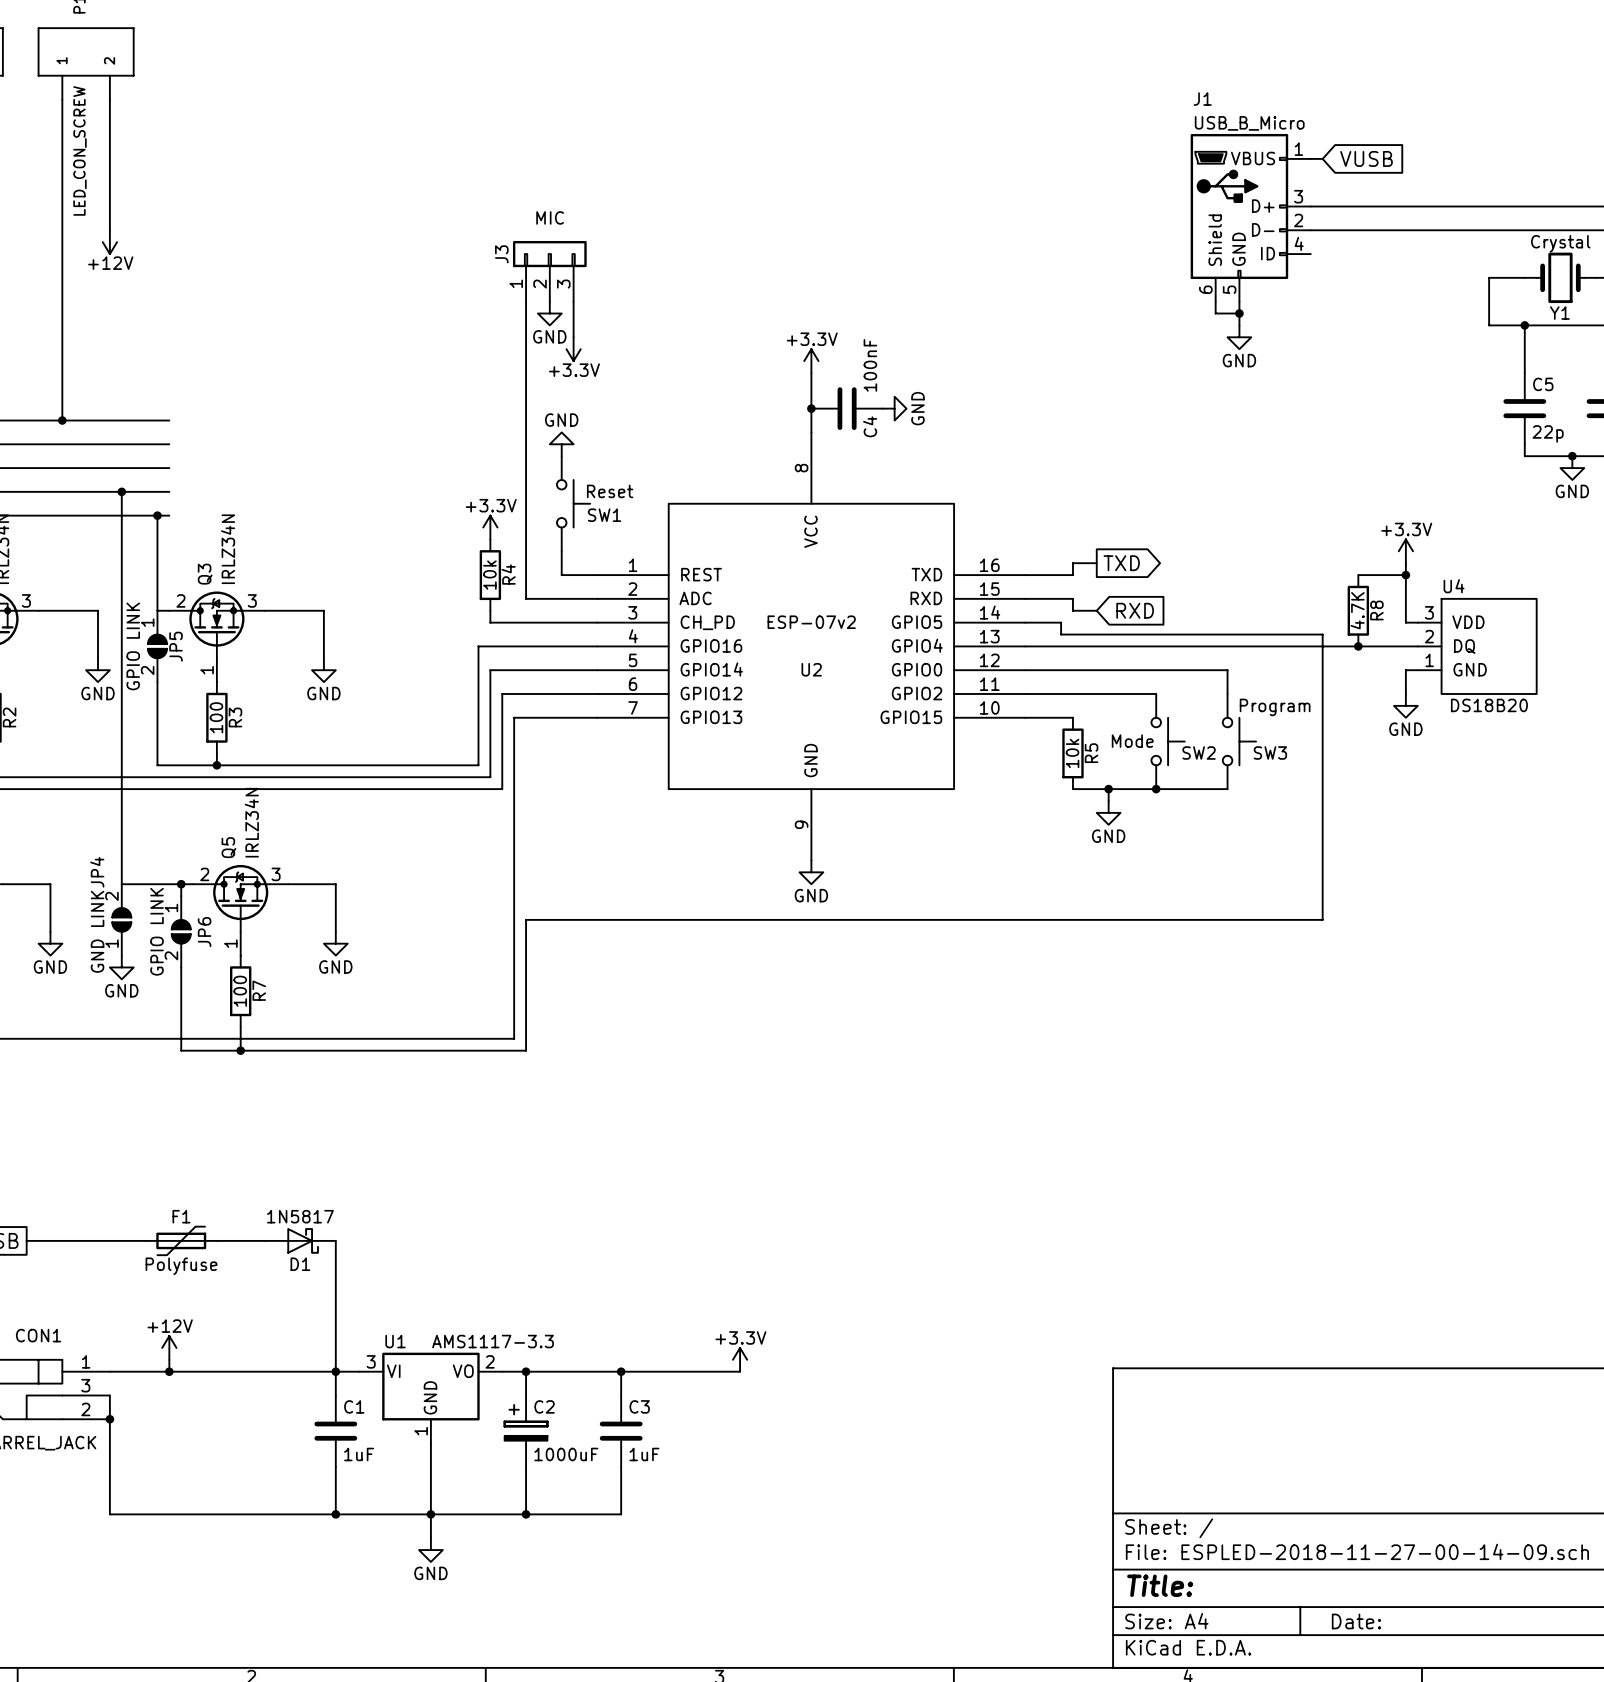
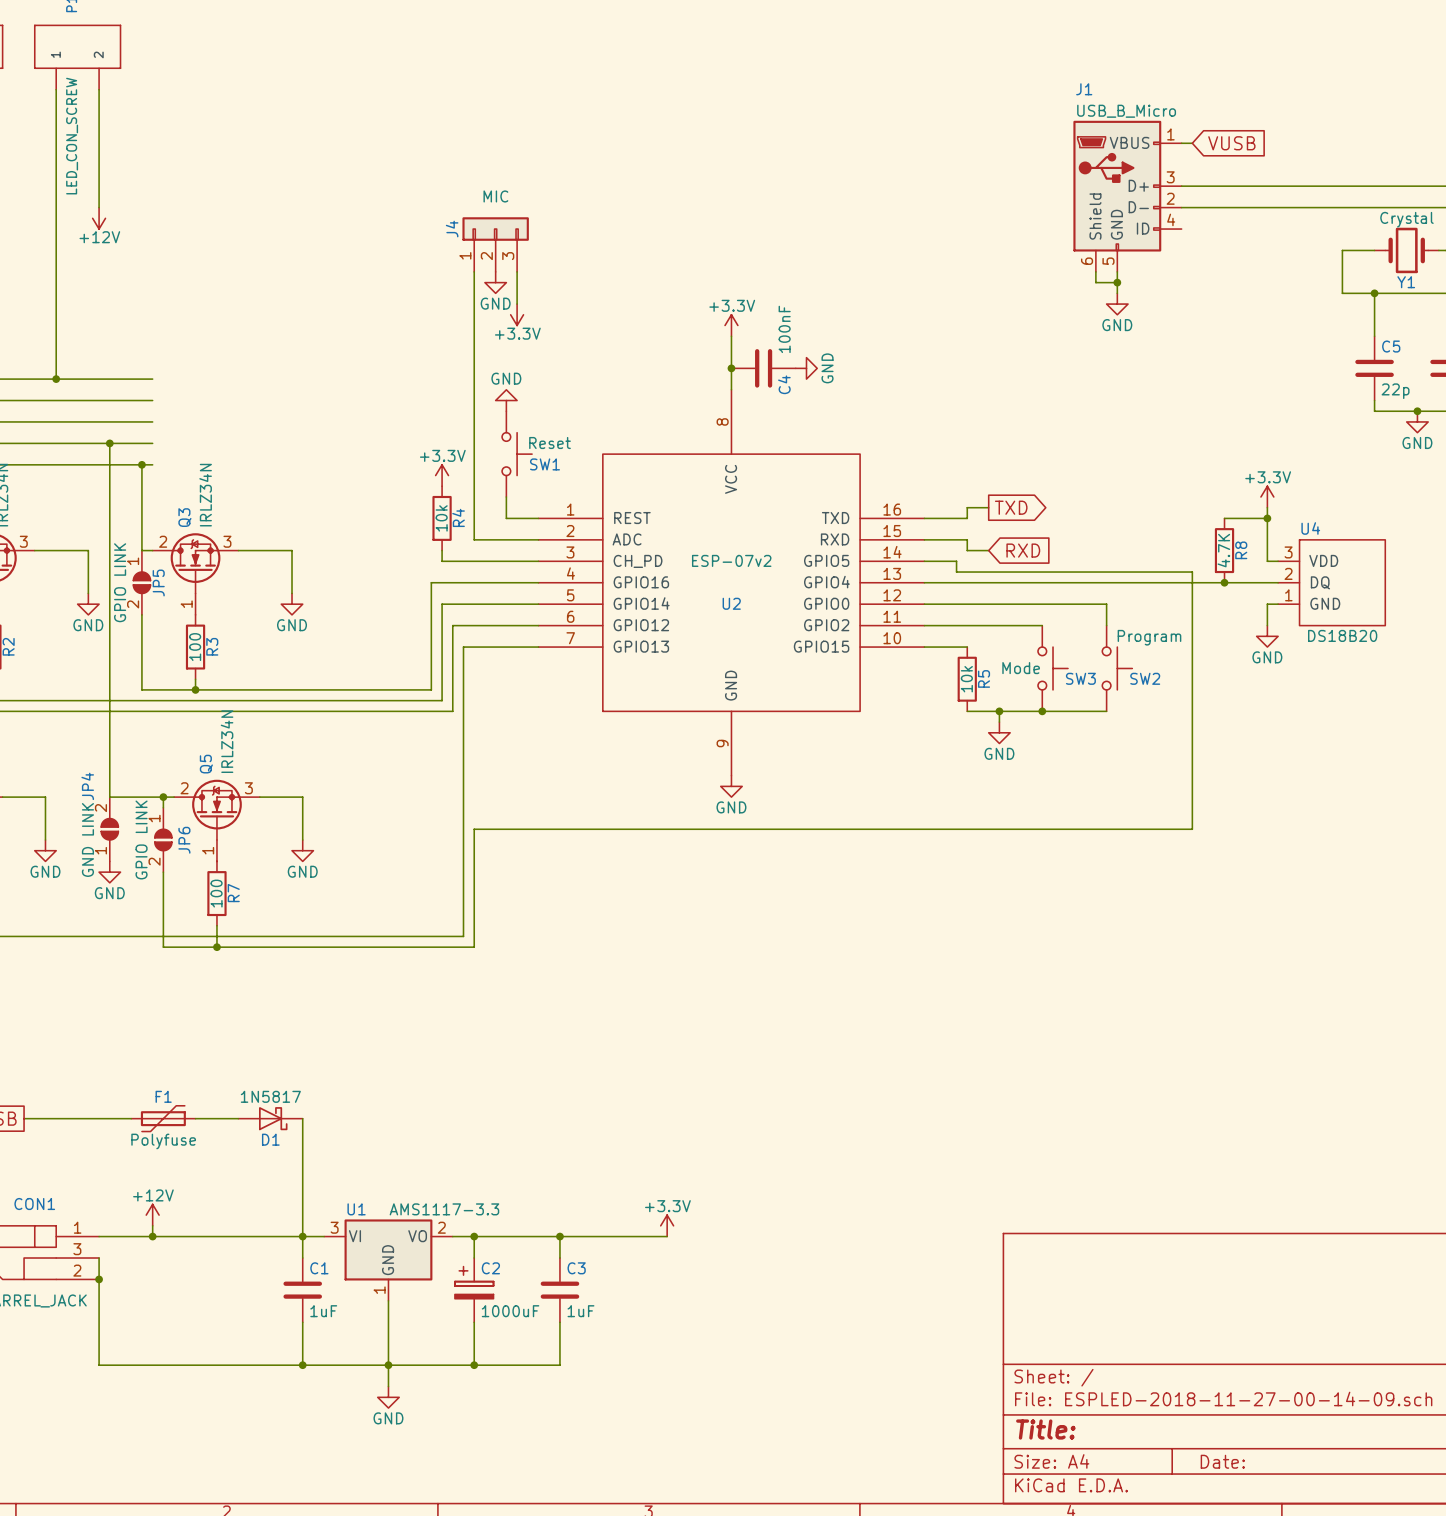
J3 name: J3 (501, 254) -> J4 (452, 229)
SW2 name: SW2 (1199, 752) -> SW3 (1080, 678)
SW3 name: SW3 (1270, 752) -> SW2 (1145, 678)

